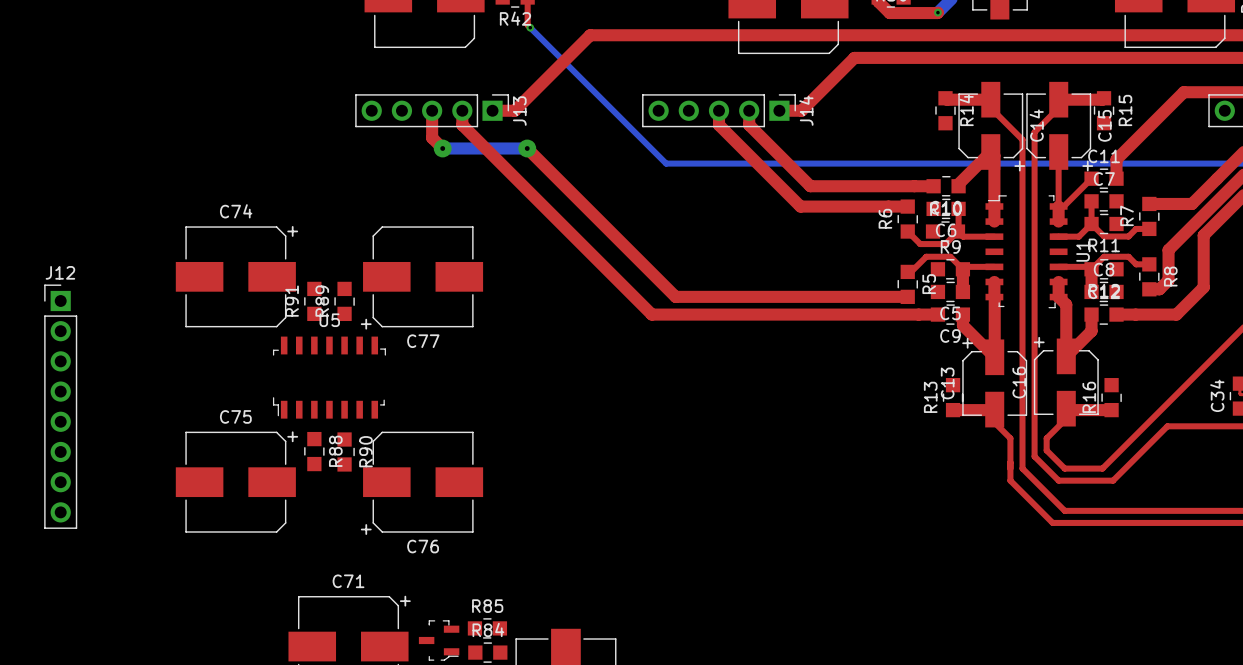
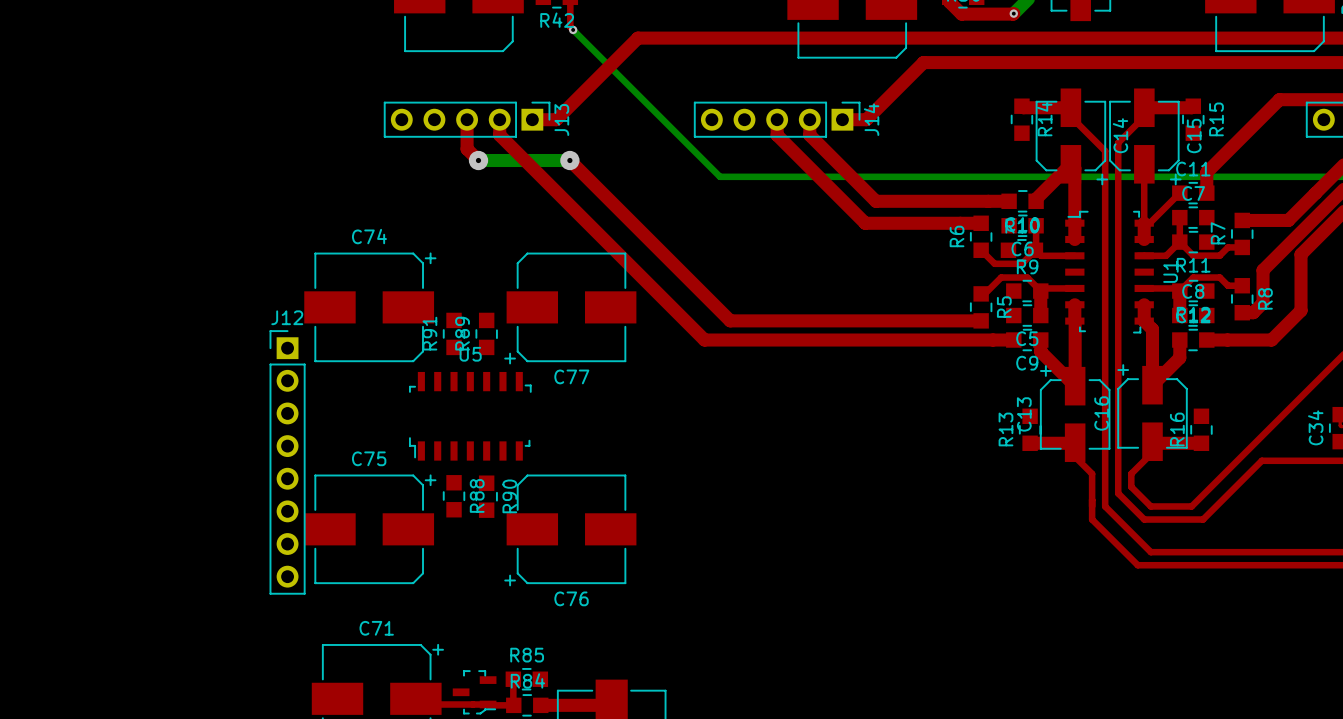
C74 position: (235, 276) -> (369, 307)
C77 position: (423, 276) -> (571, 307)
R91 position: (314, 301) -> (454, 333)
R89 position: (344, 301) -> (486, 333)
U5 position: (329, 377) -> (470, 416)
J12 position: (60, 406) -> (287, 462)
R88 position: (314, 451) -> (454, 496)
R90 position: (344, 451) -> (486, 496)
C75 position: (235, 482) -> (369, 529)
C76 position: (423, 482) -> (571, 529)
top track: none -> (513, 679) (513, 705) (431, 704) (425, 698) (415, 698)
top track: none -> (540, 705) (611, 705)

